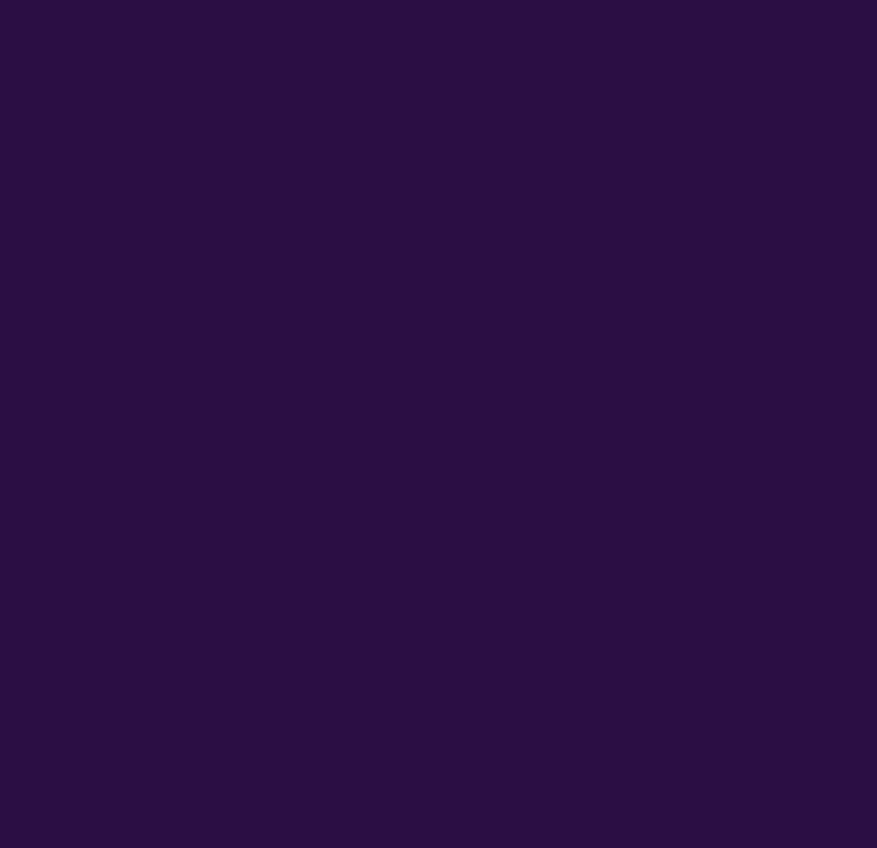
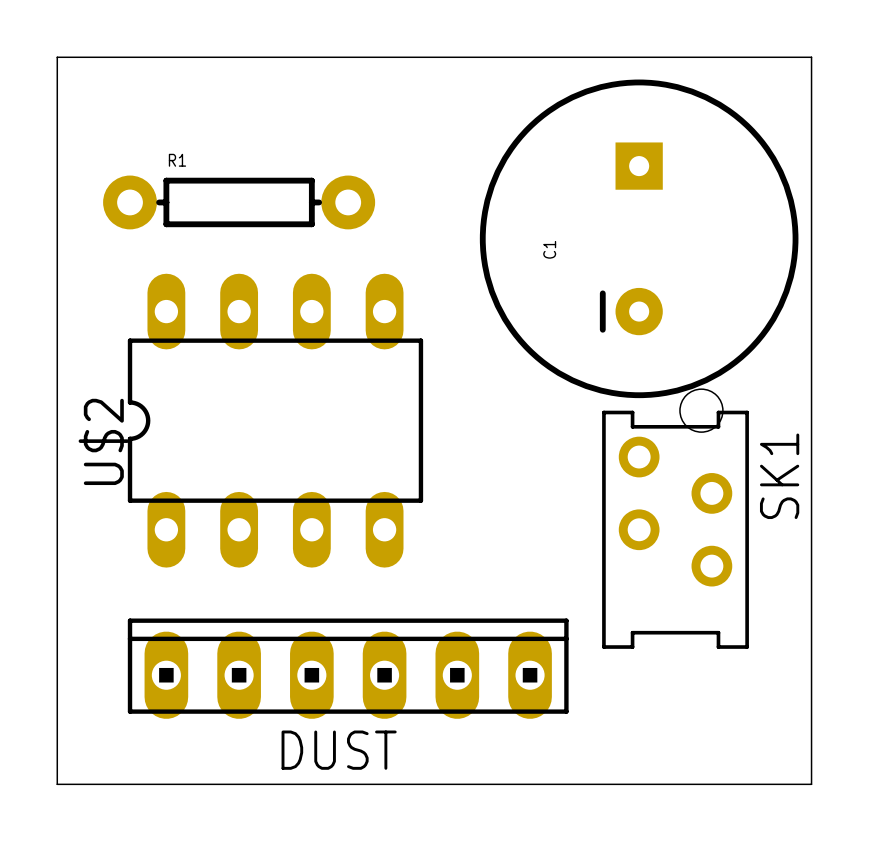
board edge: none -> (57, 57) (811, 57) (811, 784) (57, 784) (57, 57)
R1: none -> (239, 202)
C1: none -> (639, 238)
U$2: none -> (275, 420)
SK1: none -> (675, 519)
DUST: none -> (348, 668)

